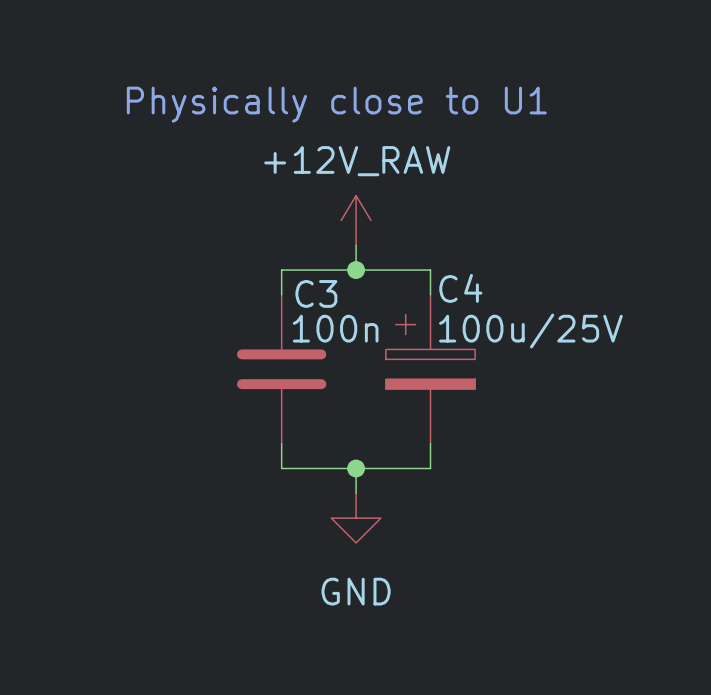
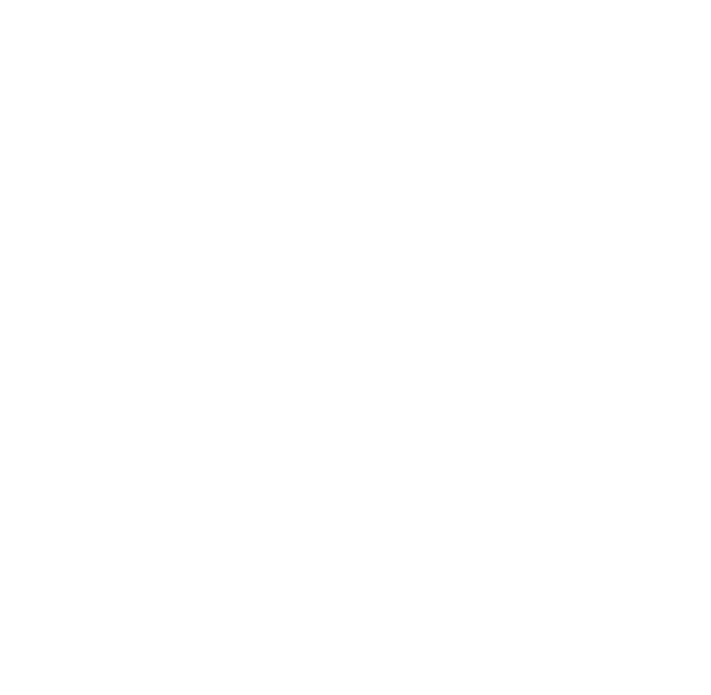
text: Physically close to U1 (336, 104) -> none
power symbol: +12V_RAW (356, 220) -> none
wire: (356, 245) (356, 270) -> none
junction: (356, 270) -> none
wire: (281, 294) (281, 270) (430, 270) (430, 294) -> none
C3: 100n (281, 369) -> none
C4: 100u/25V (430, 369) -> none
wire: (281, 443) (281, 468) (430, 468) (430, 443) -> none
wire: (356, 468) (356, 493) -> none
junction: (356, 468) -> none
power symbol: GND (356, 518) -> none

